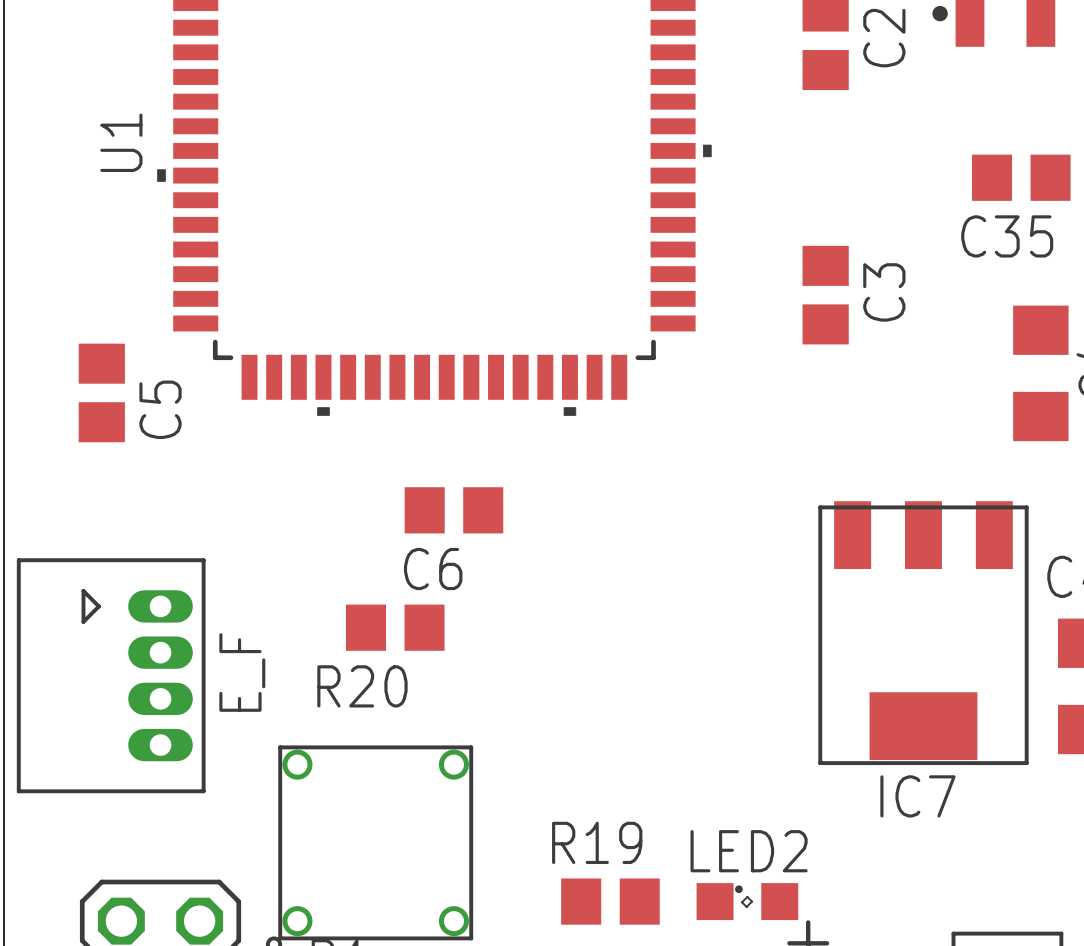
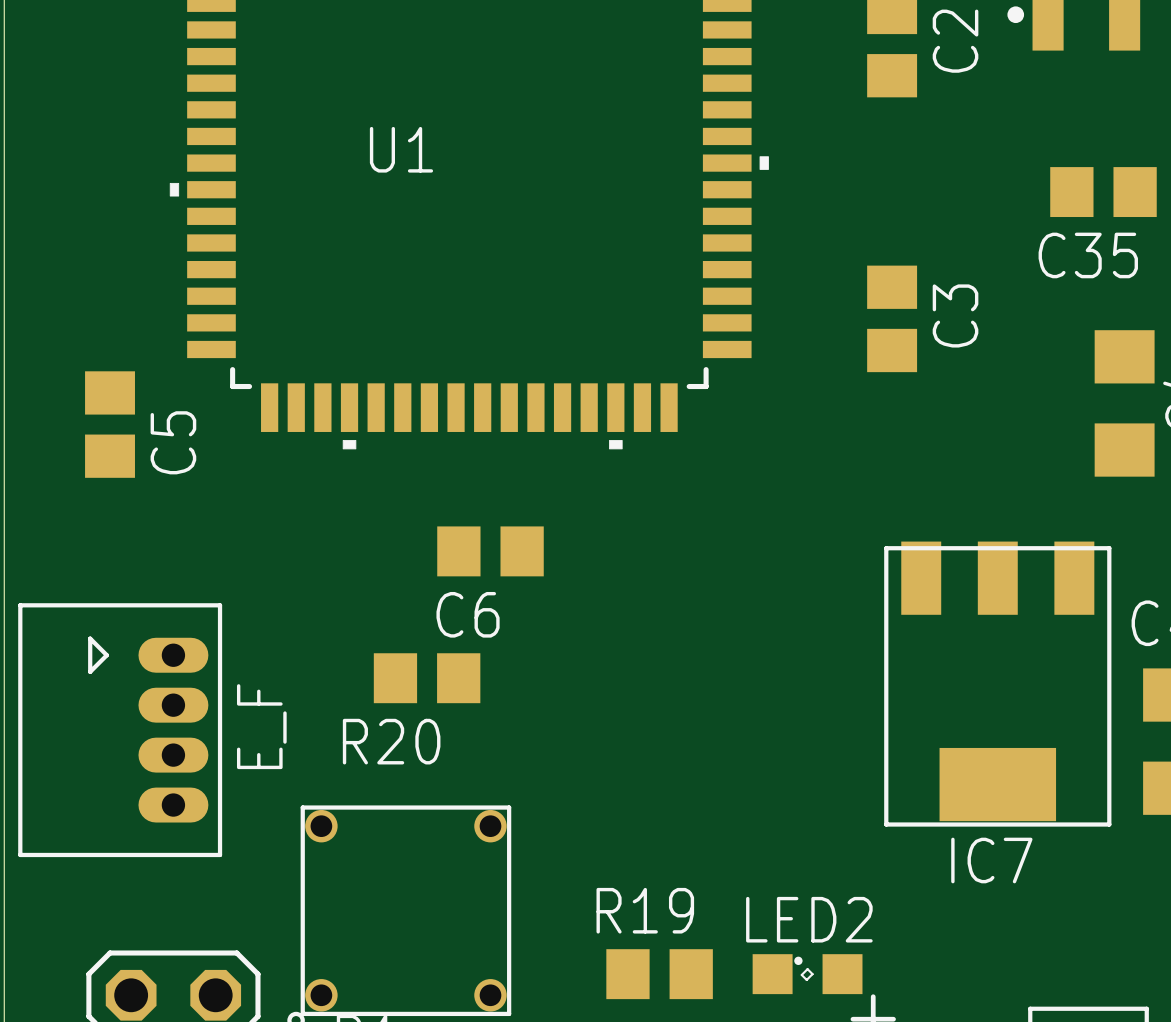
U1 name rotation: 0° (121, 142) -> 90° clockwise (401, 149)
U1 name position: U1 (121, 142) -> U1 (401, 149)

